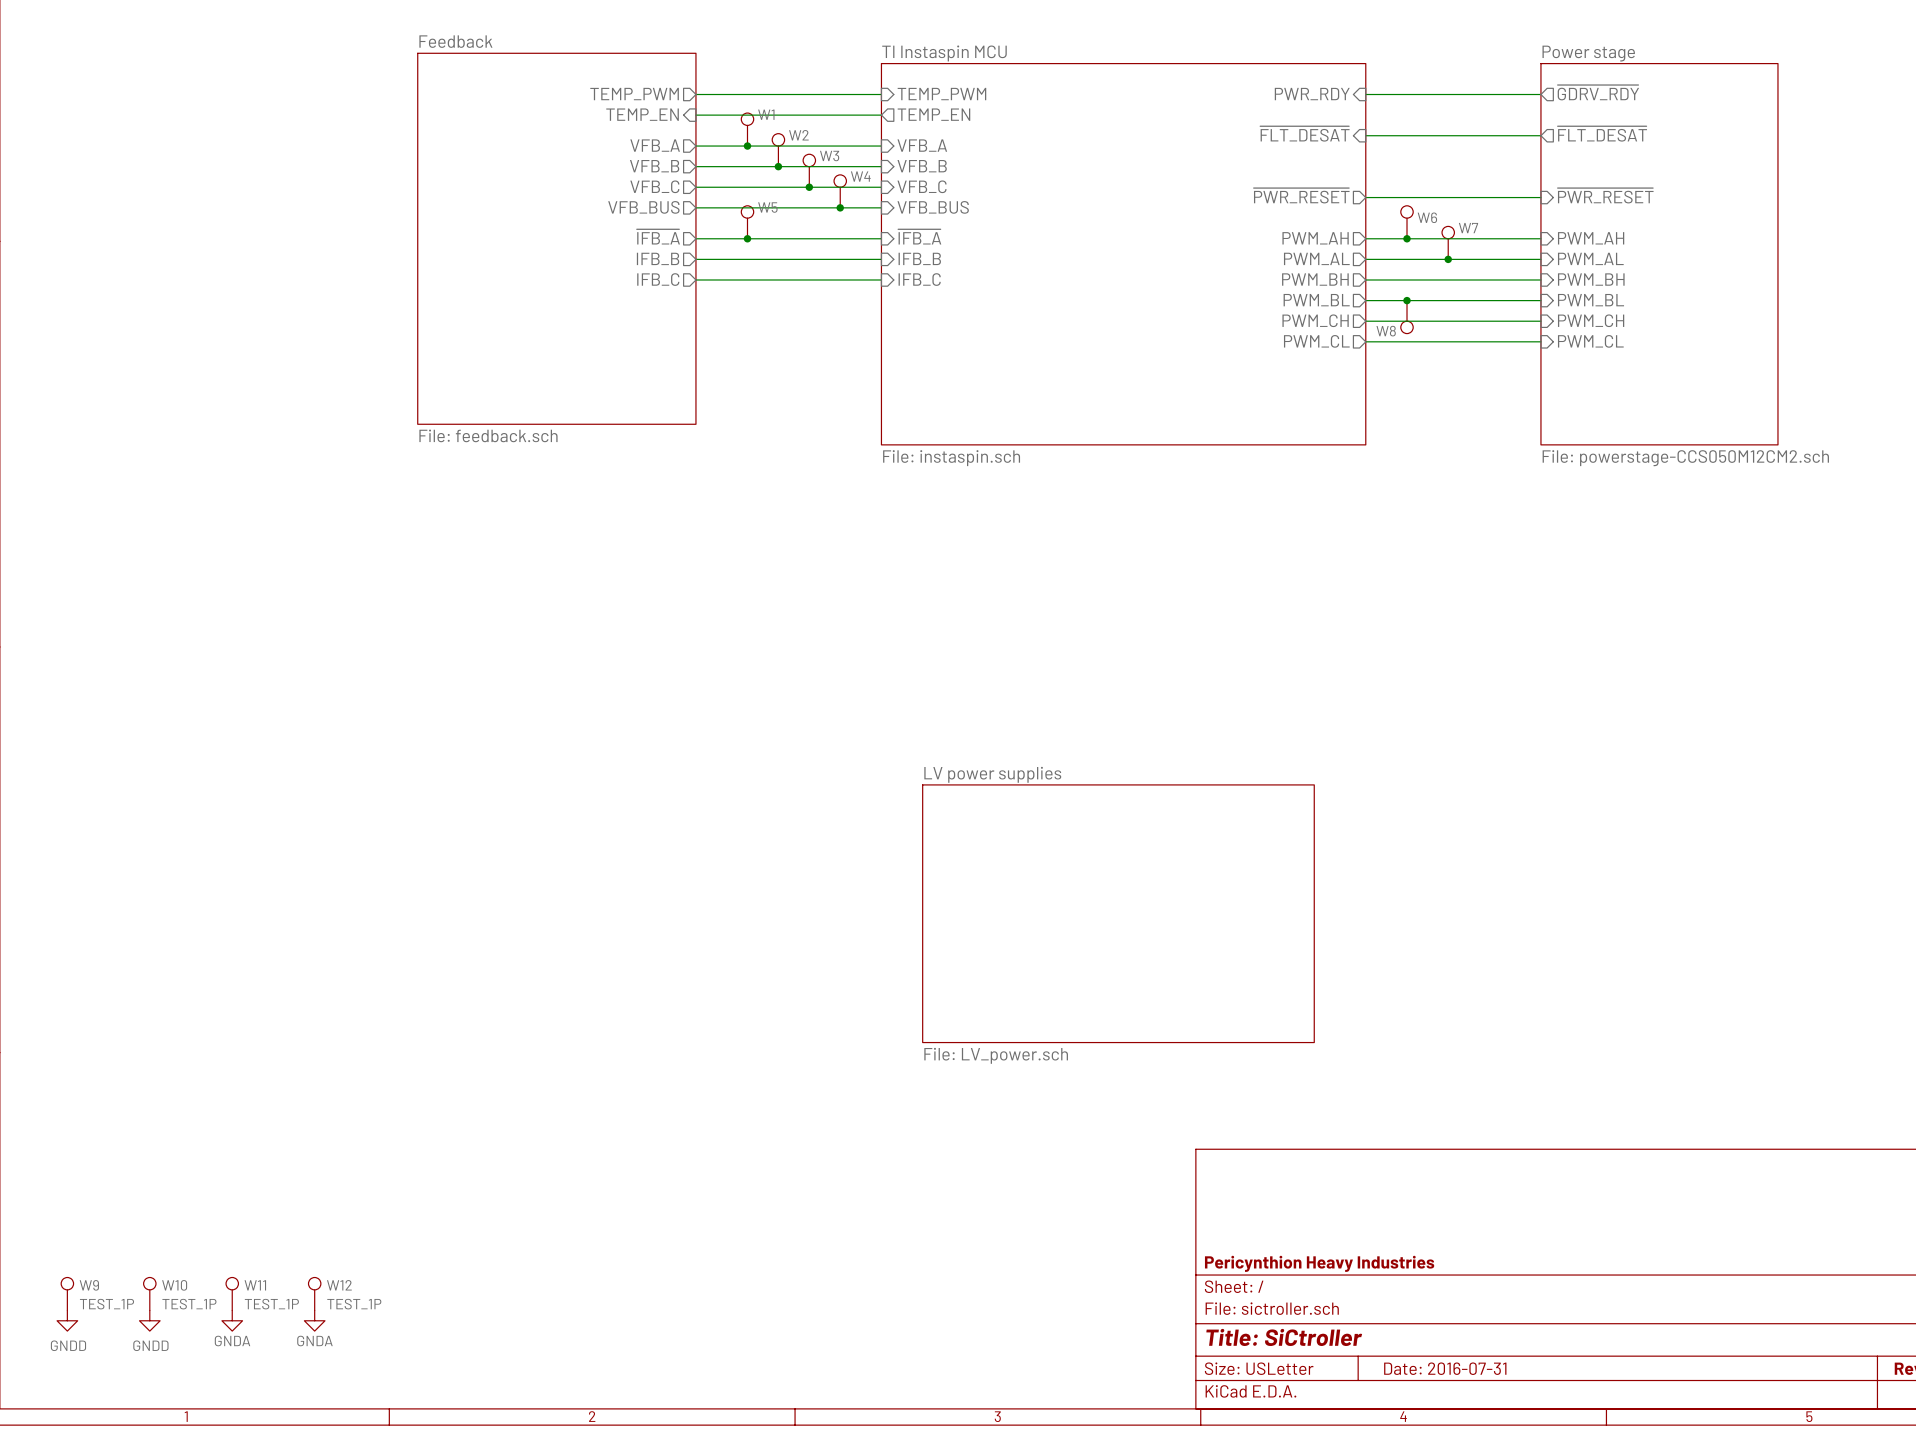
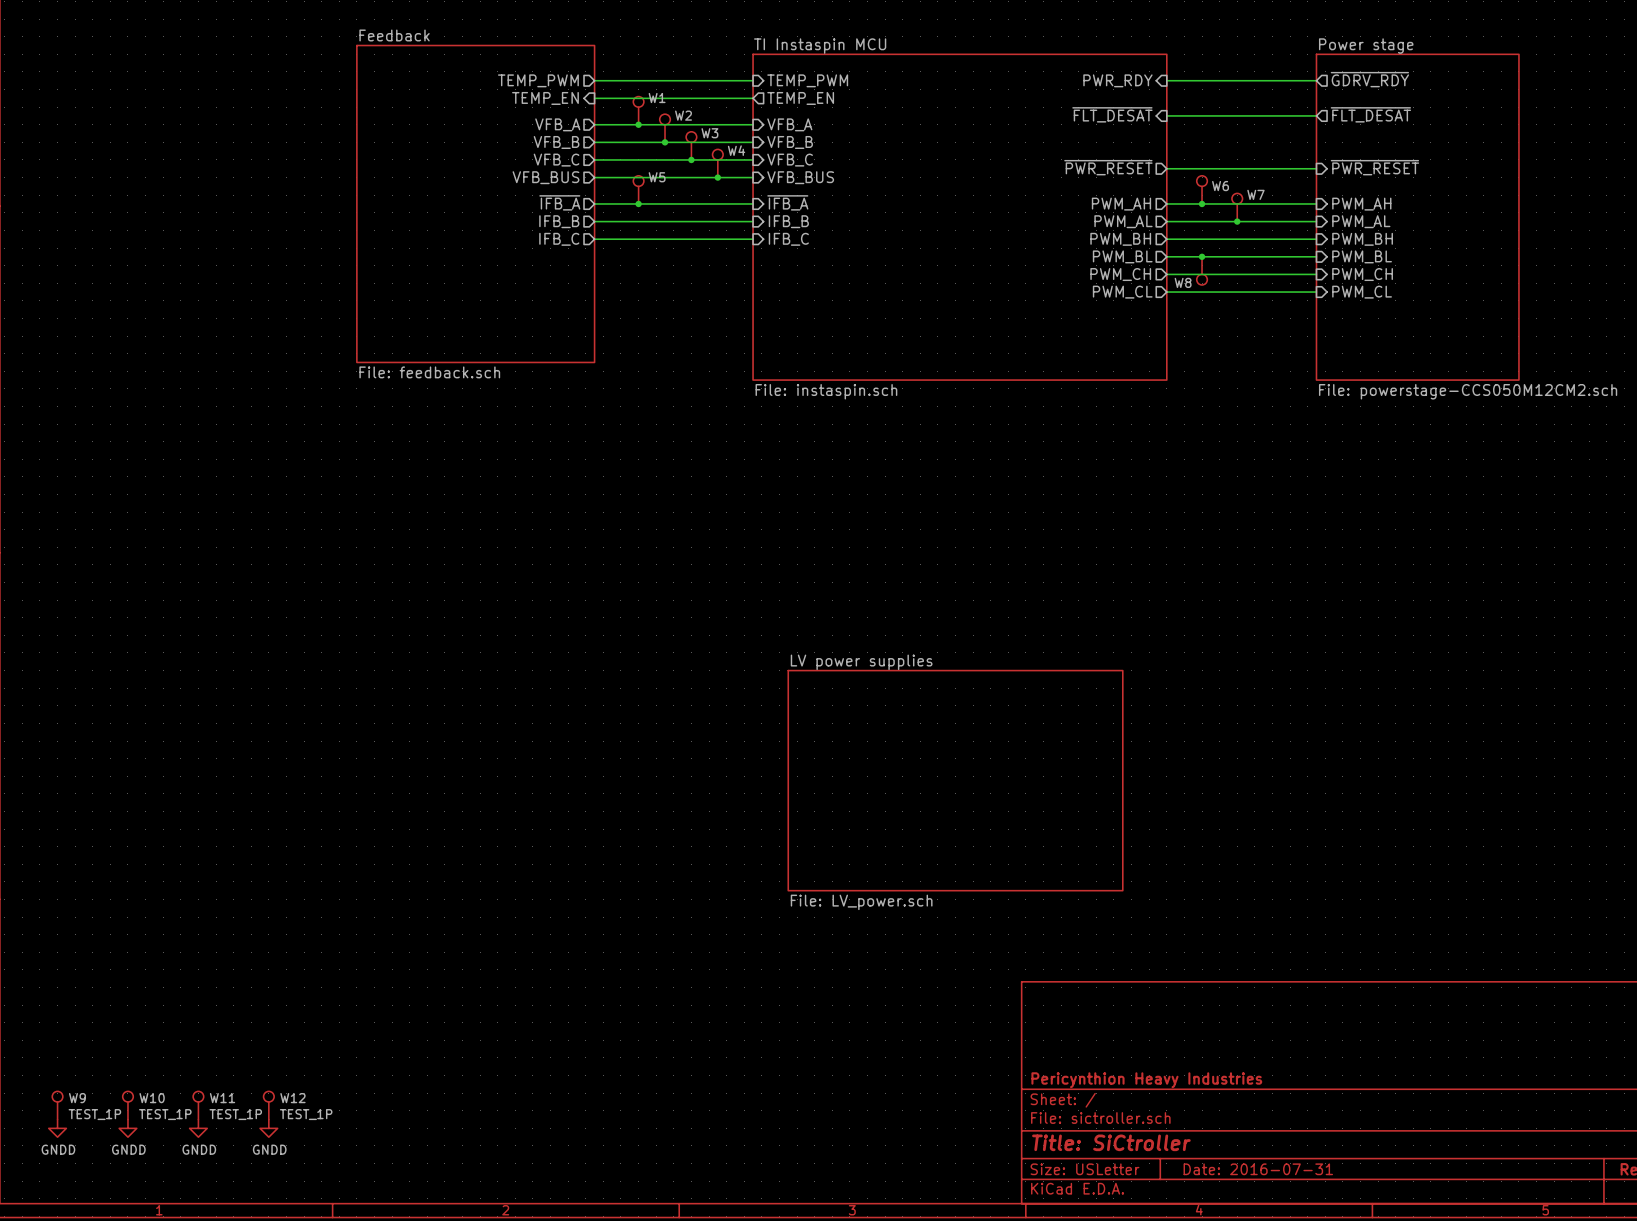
power symbol: GNDA (232, 1320) -> GNDD (198, 1128)
power symbol: GNDA (314, 1320) -> GNDD (268, 1128)

